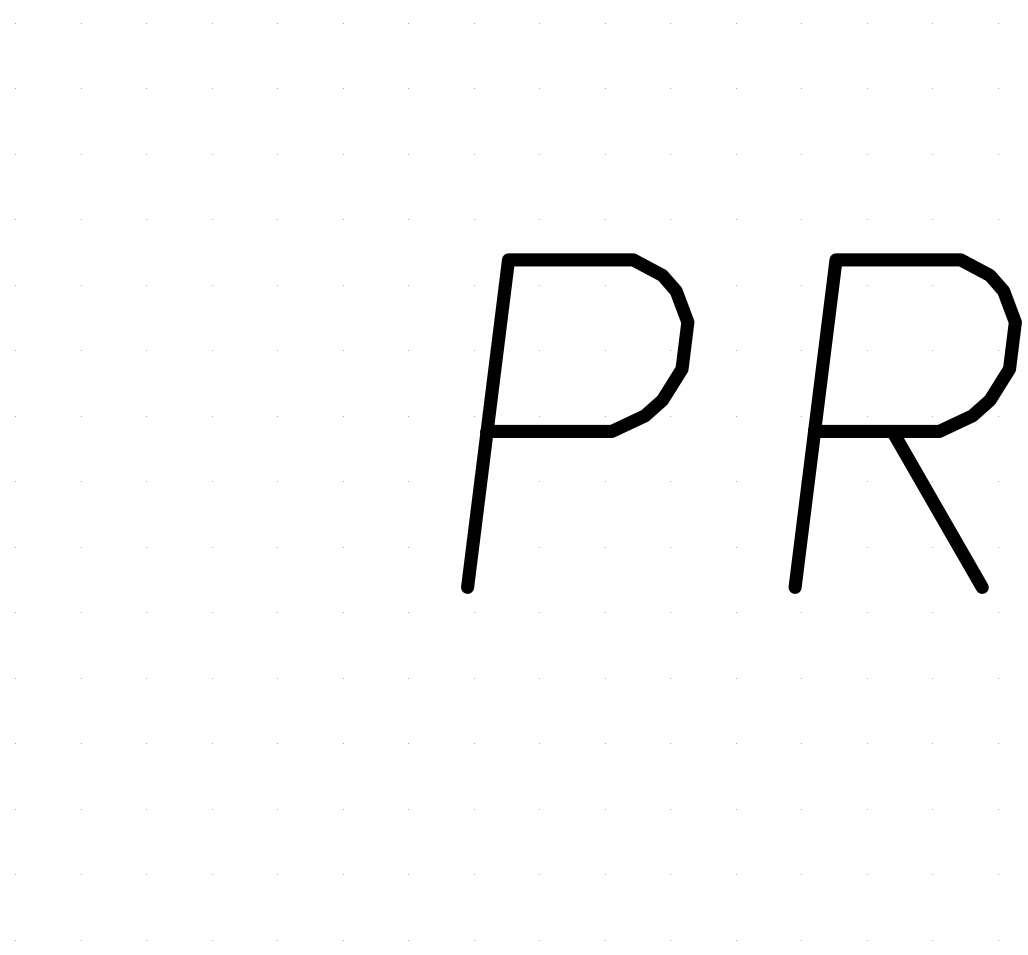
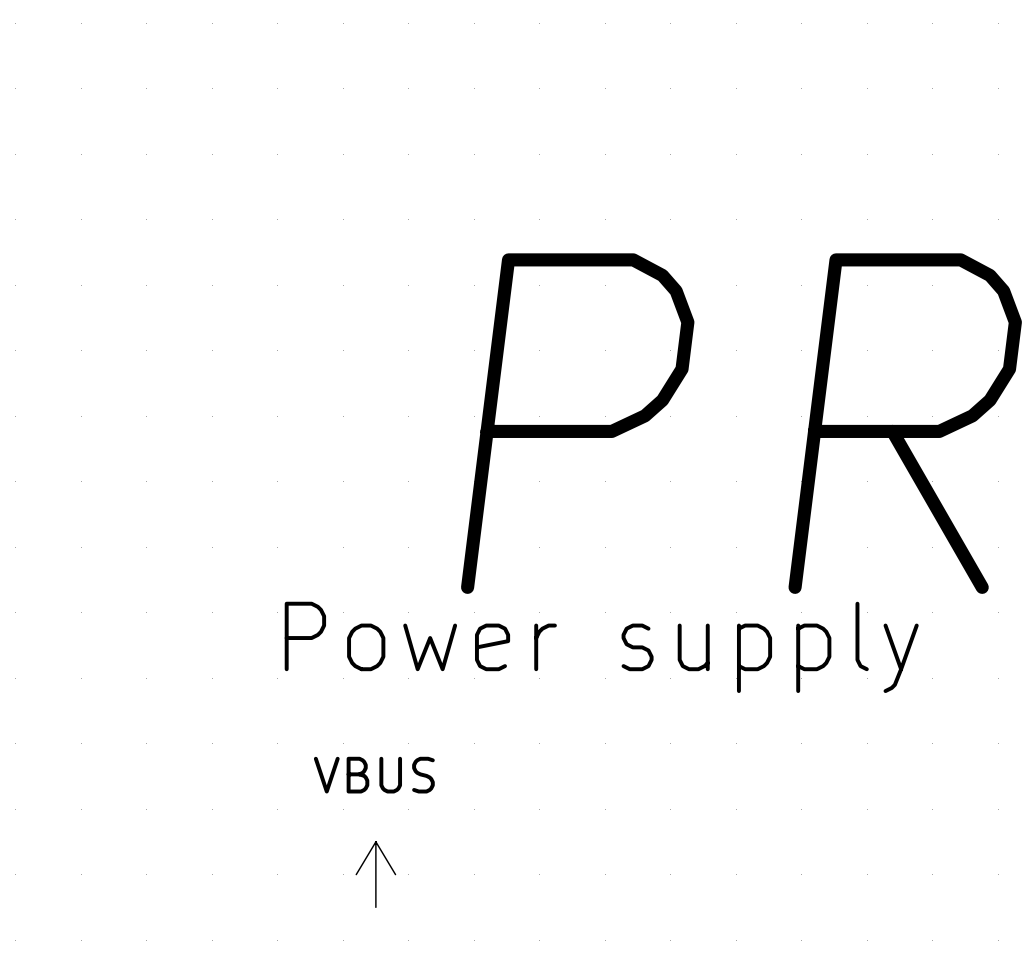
text: none -> Power supply (601, 647)
power symbol: none -> VBUS (375, 874)

